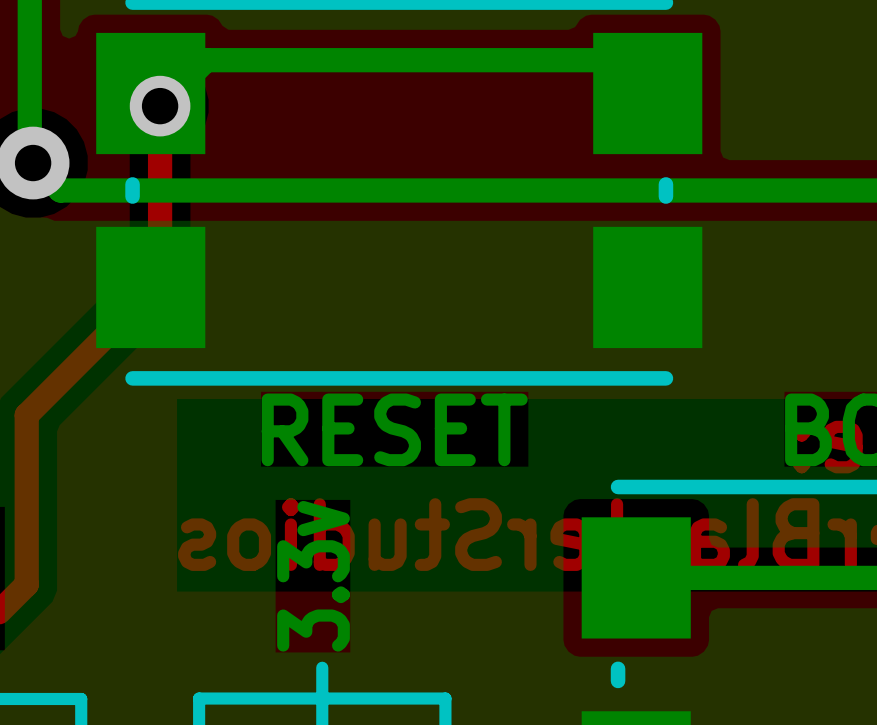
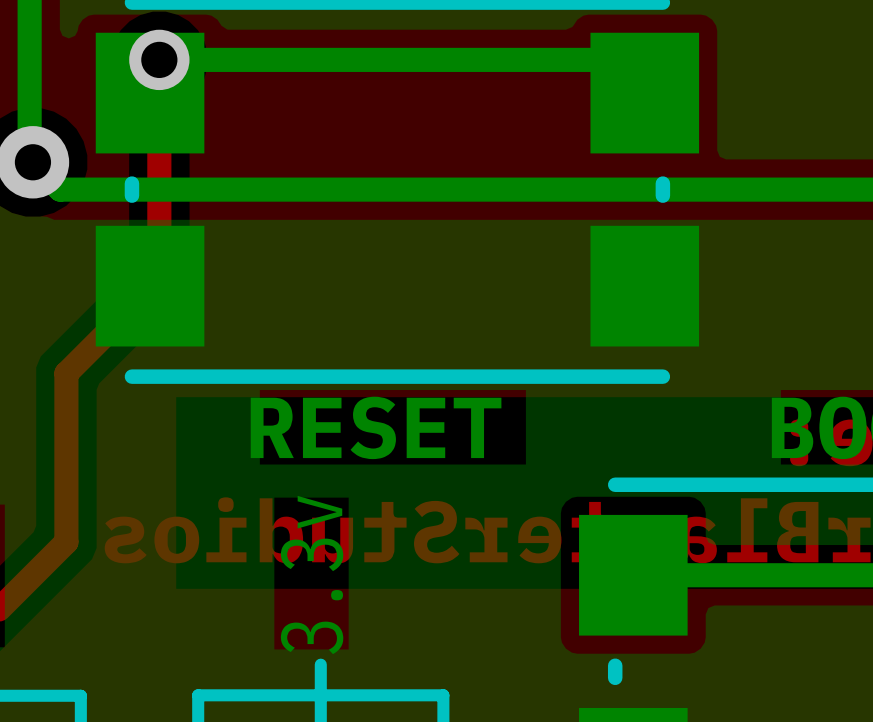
via position: (160, 106) -> (159, 59)
top track: (66, 375) (26, 415) (26, 584) -> (66, 373) (66, 542) (26, 581)

